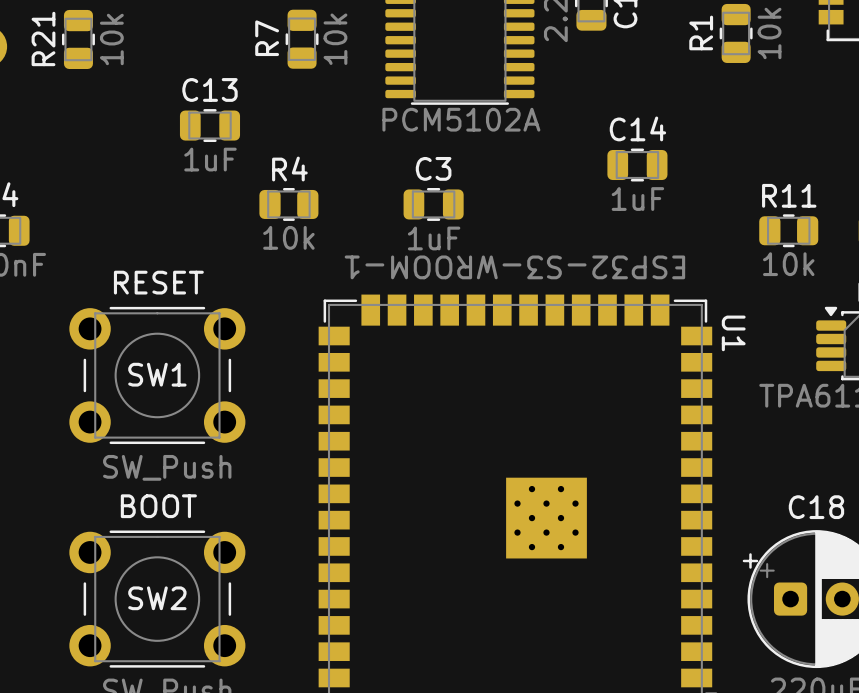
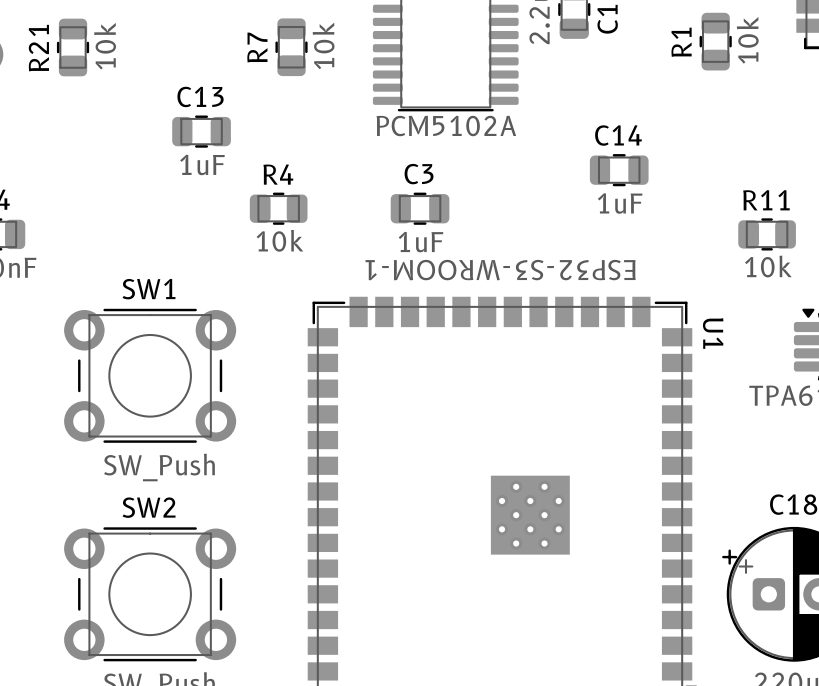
text: RESET (158, 282) -> none
SW1 name position: SW1 (157, 374) -> SW1 (149, 289)
text: BOOT (158, 506) -> none
SW2 name position: SW2 (157, 598) -> SW2 (149, 507)

